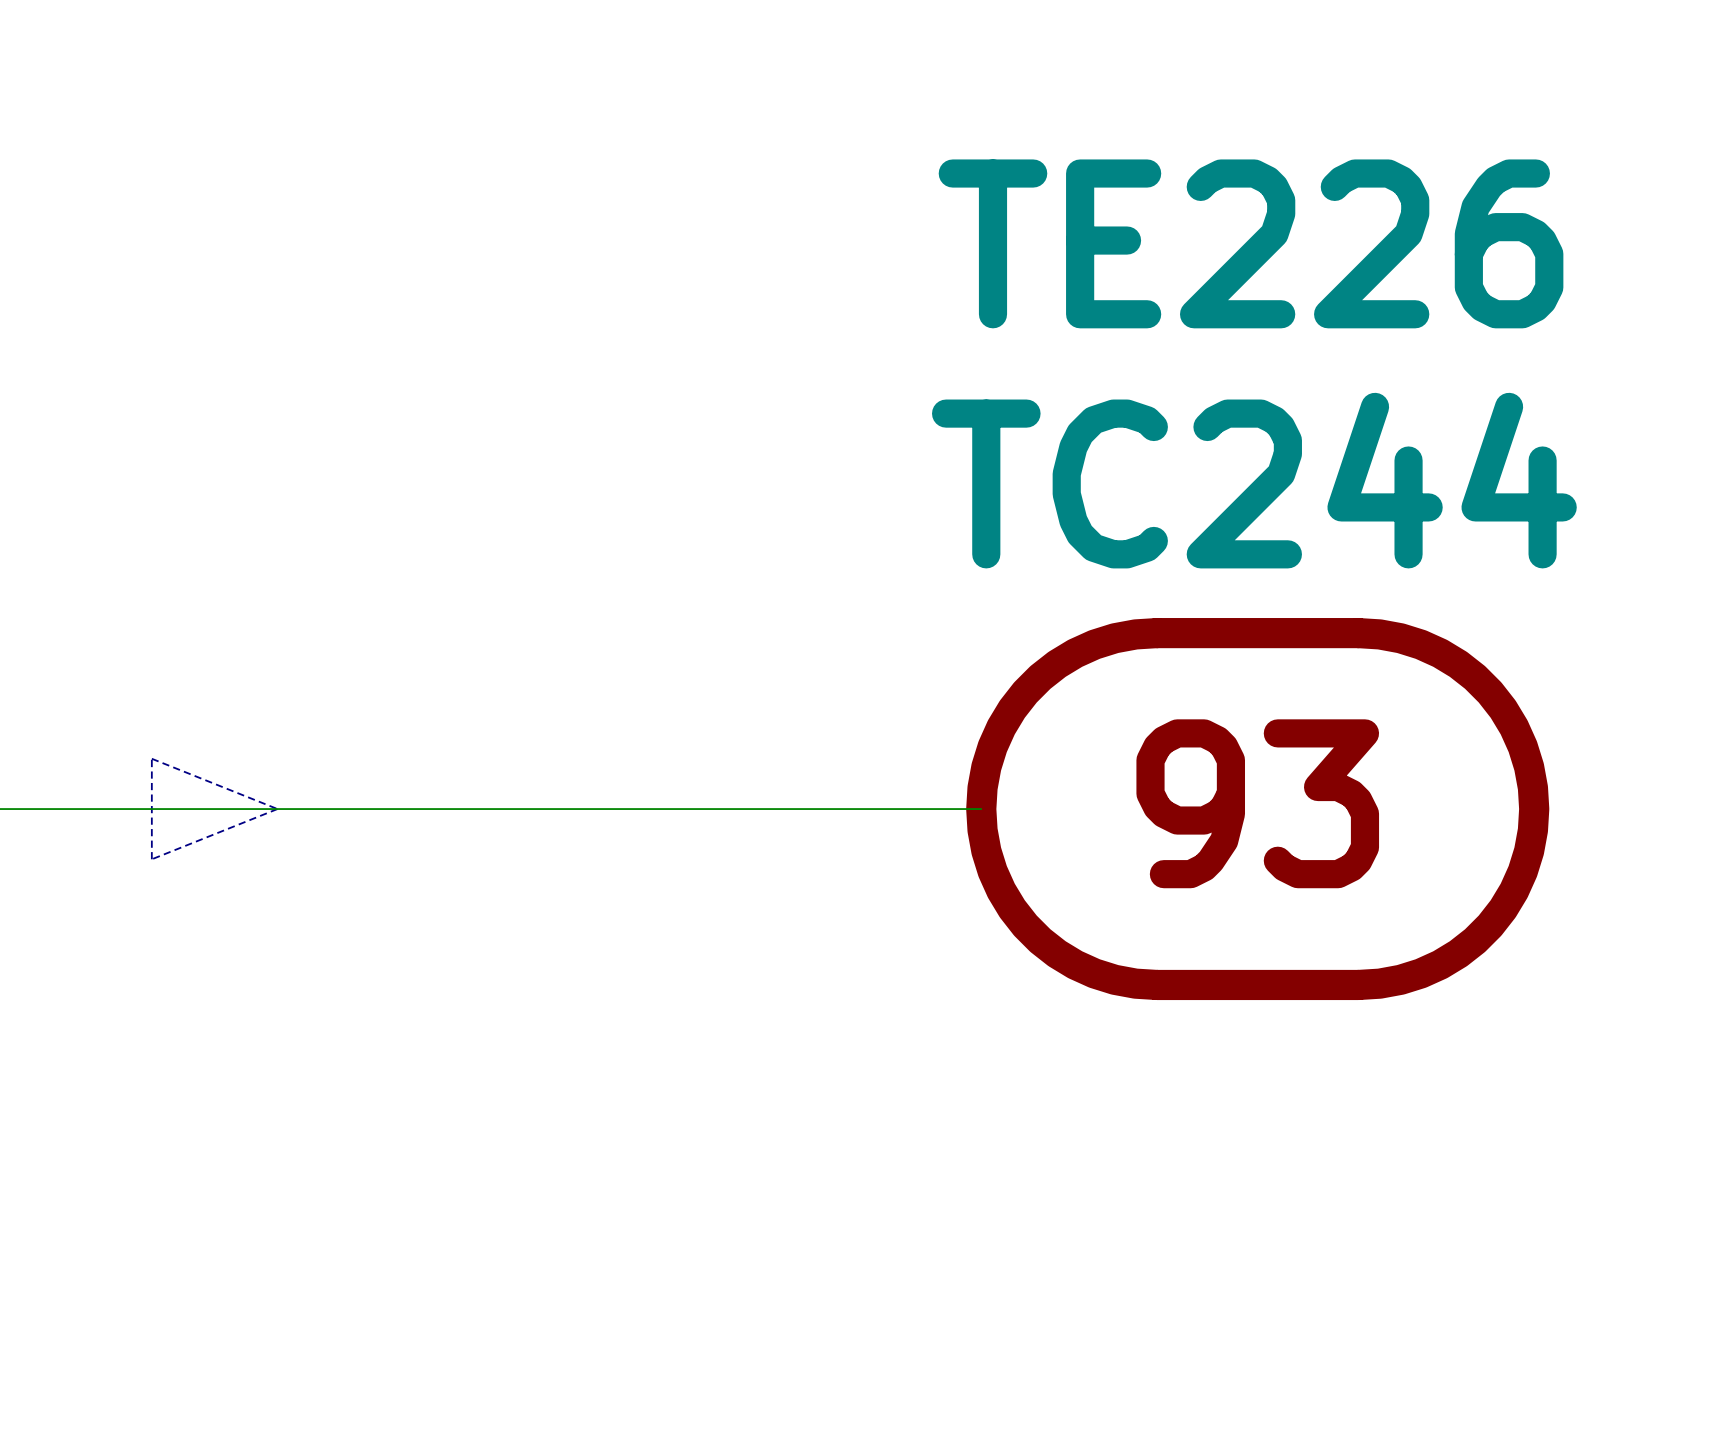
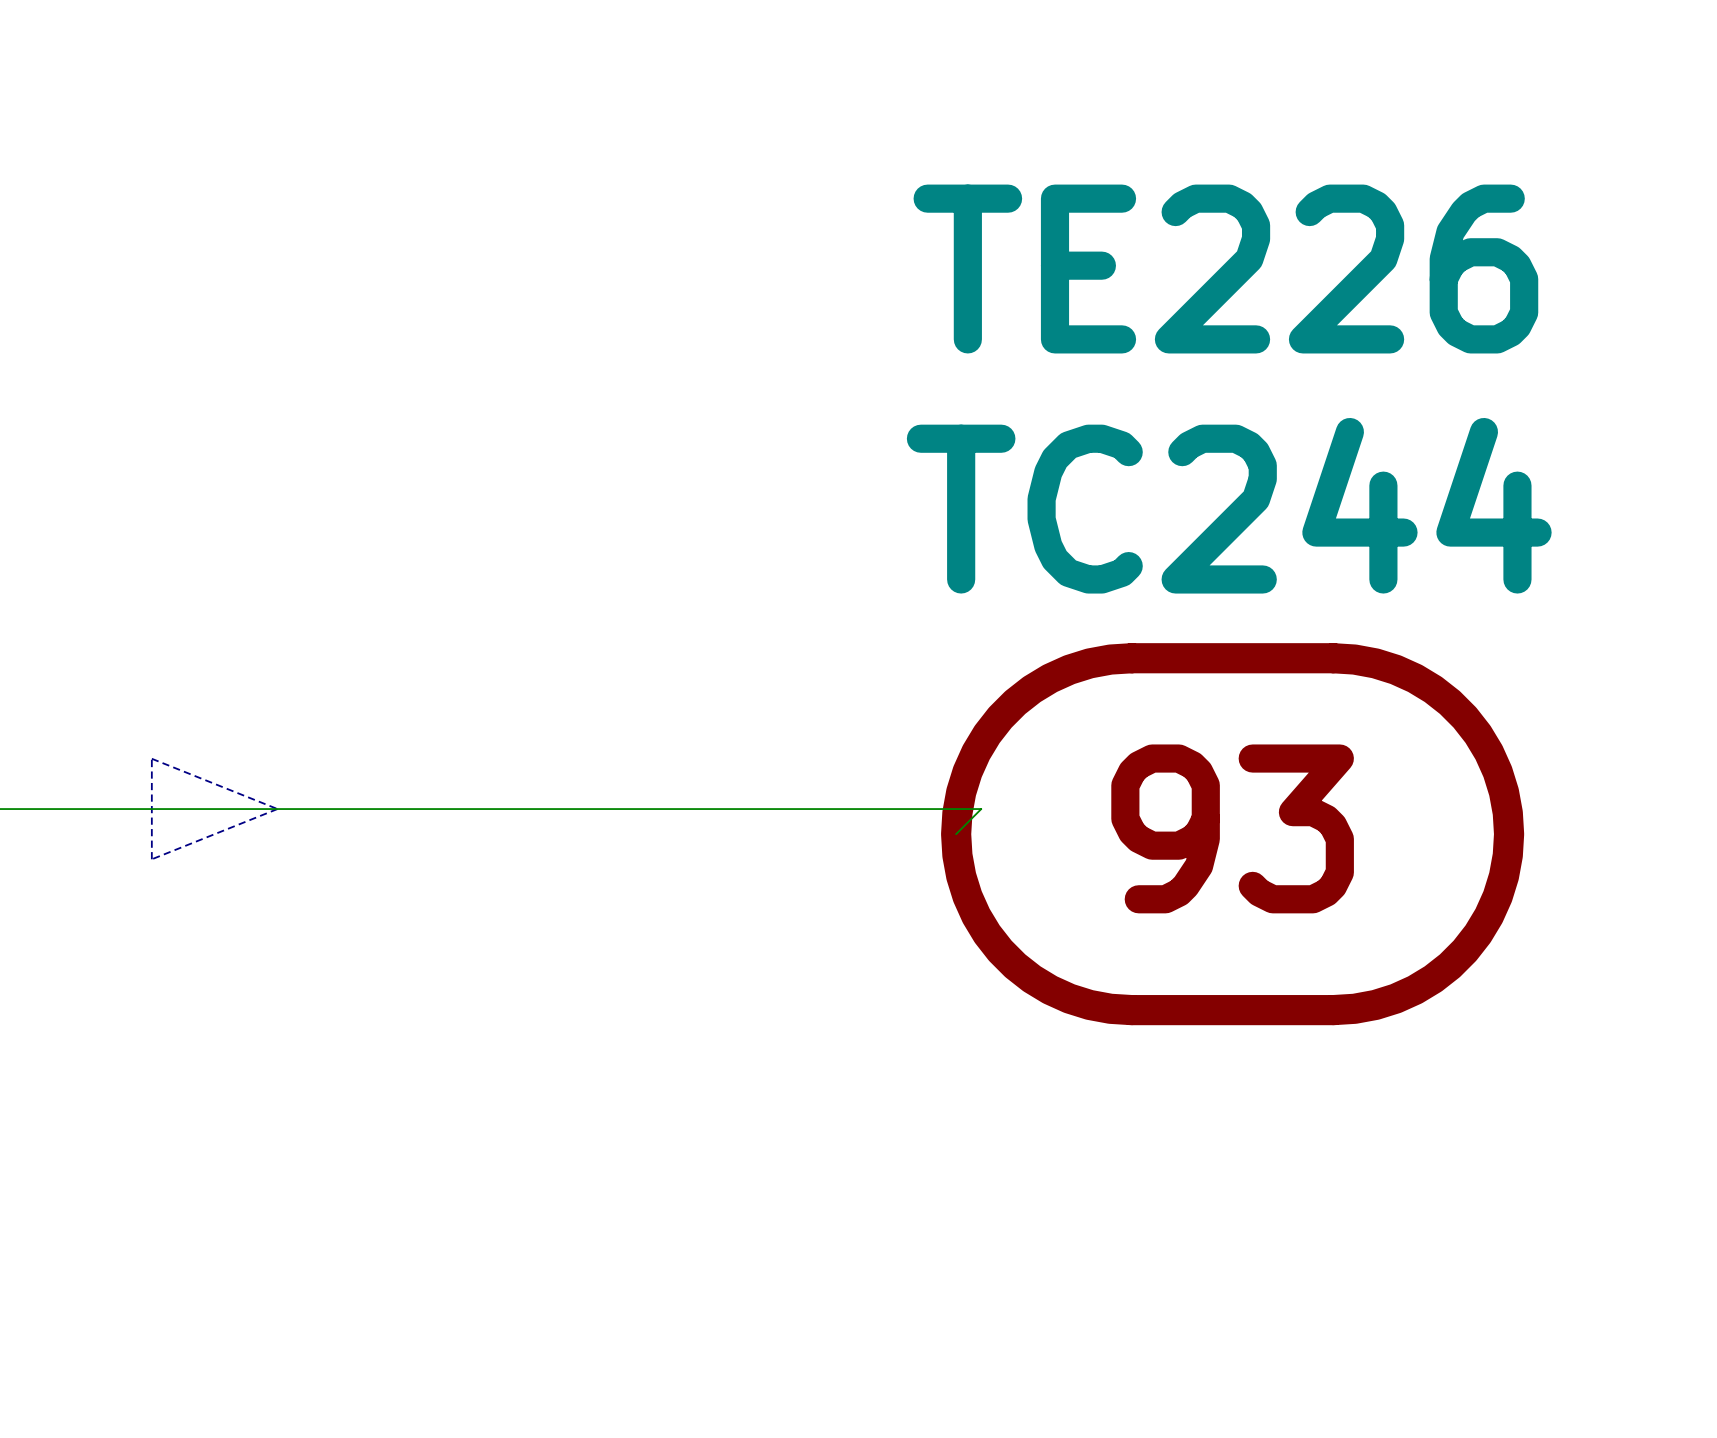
part position: (1257, 809) -> (1232, 834)

